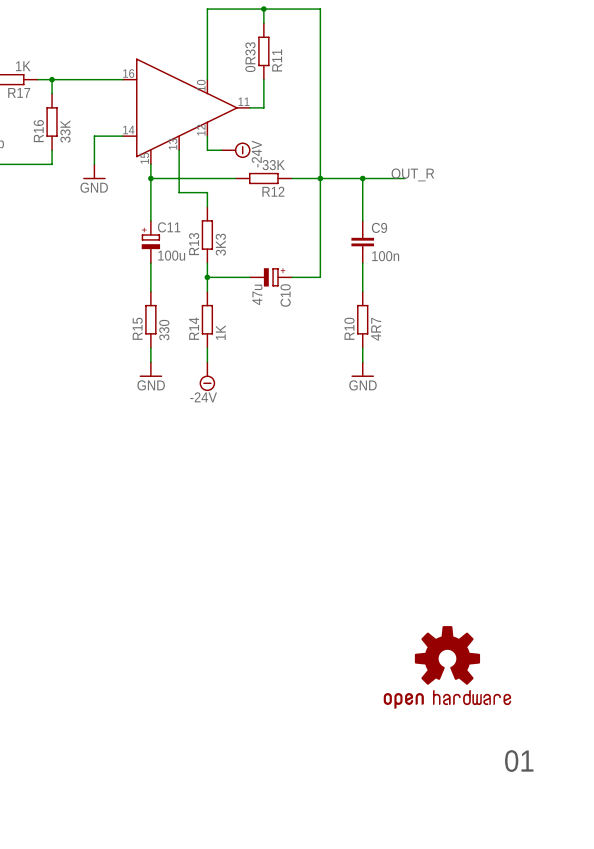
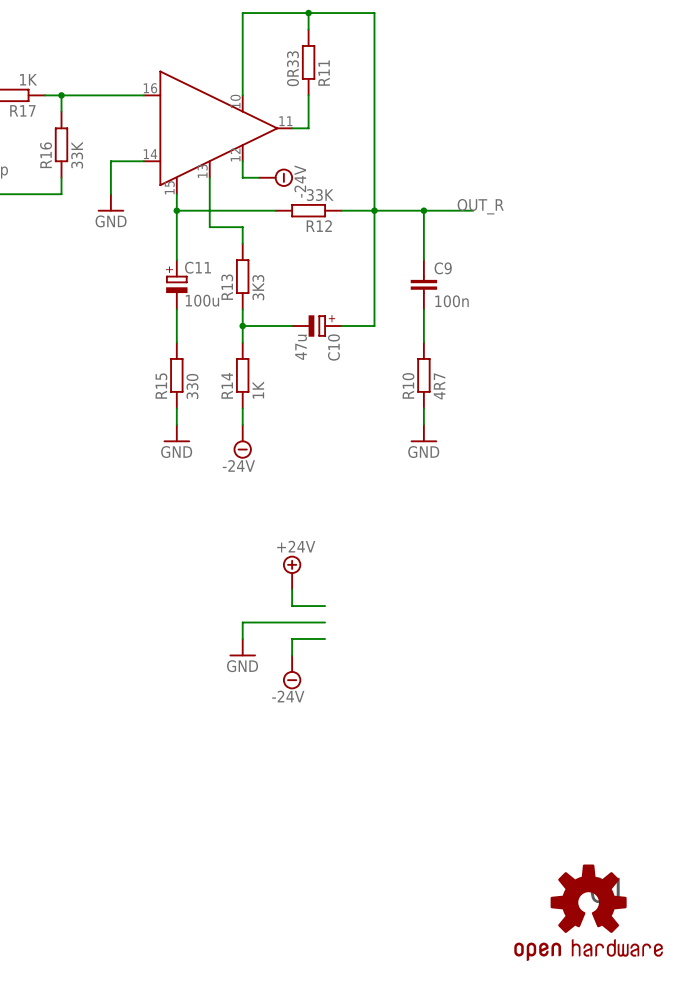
power symbol: none -> +24V (292, 572)
wire: none -> (292, 589) (292, 606) (325, 606)
wire: none -> (325, 622) (242, 622) (242, 638)
wire: none -> (325, 638) (292, 638) (292, 655)
power symbol: none -> GND (242, 647)
power symbol: none -> -24V (292, 672)
part position: (447, 667) -> (588, 912)

